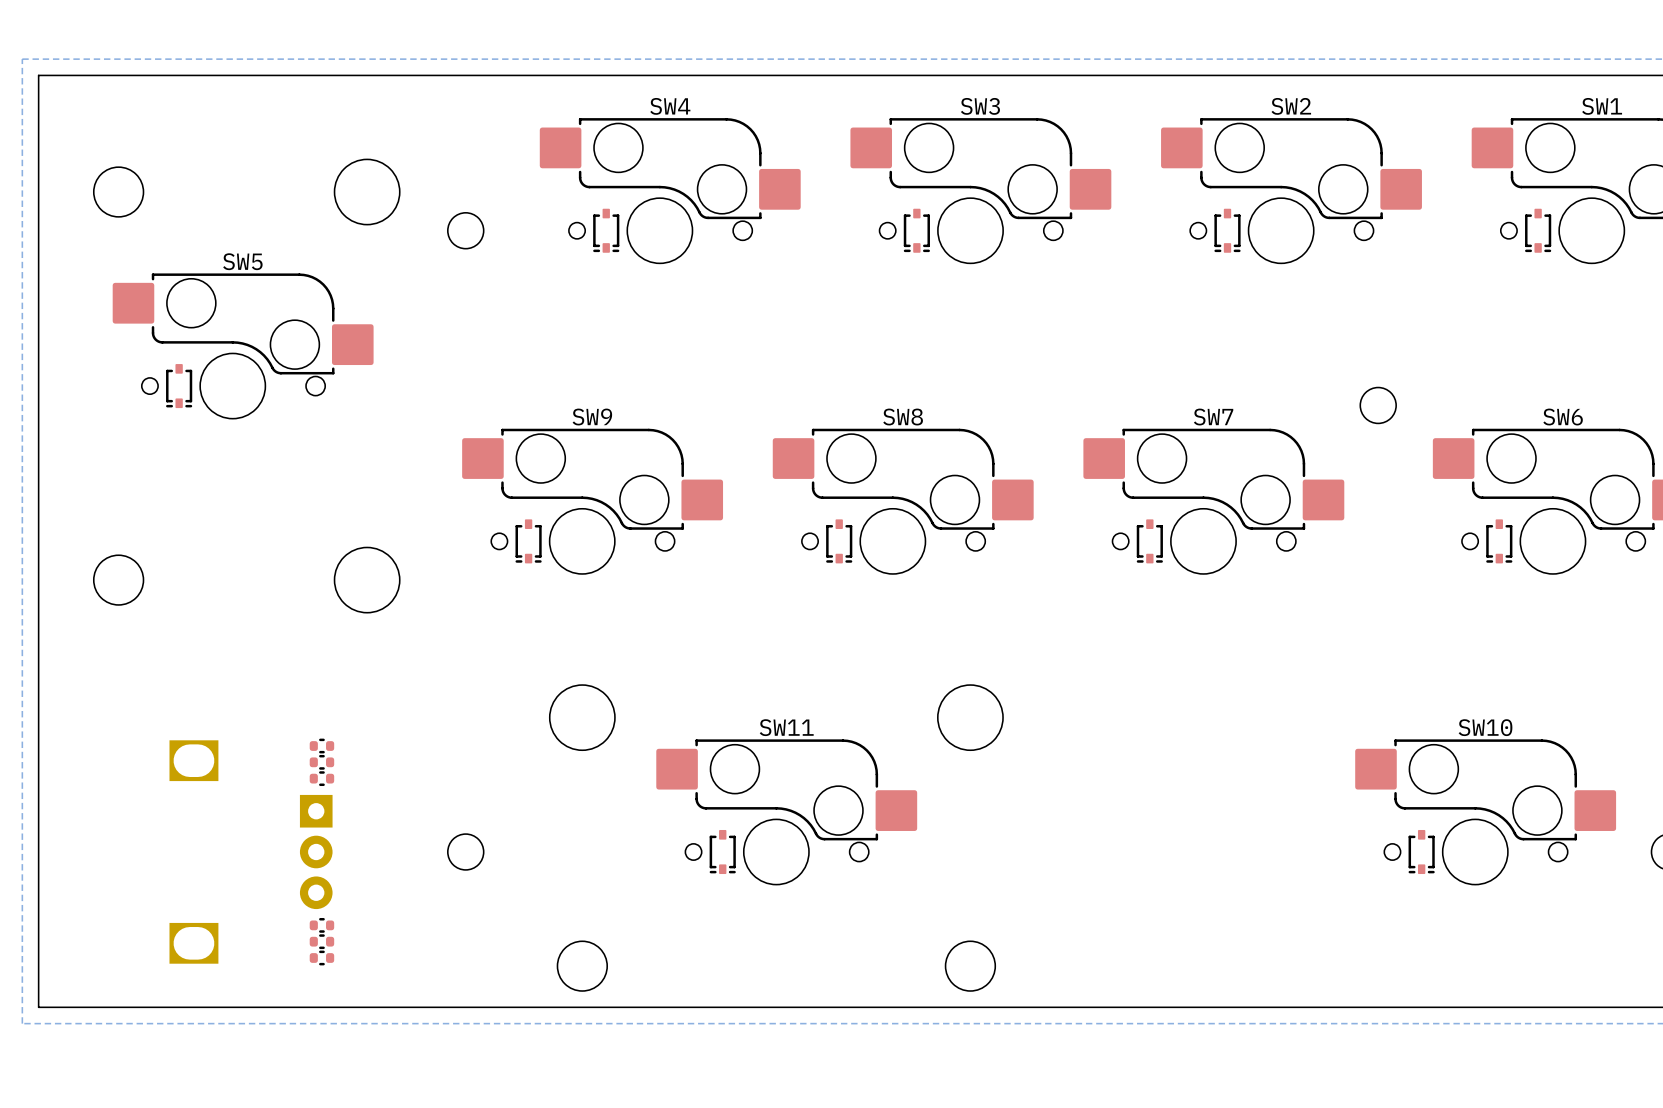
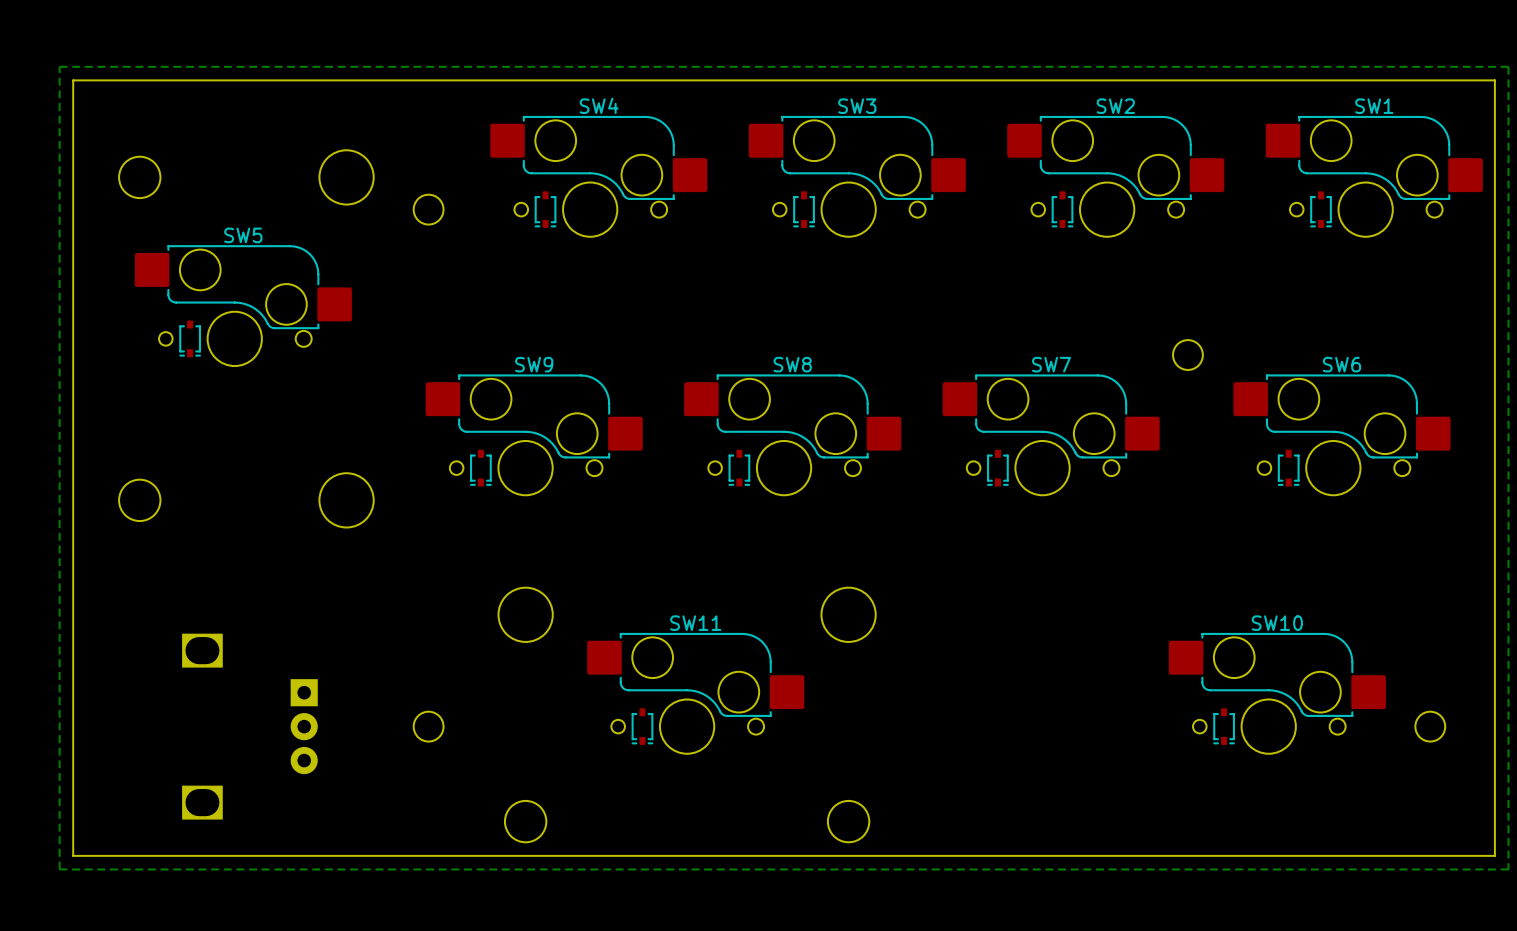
part: (321, 746) -> none
part: (321, 762) -> none
part: (321, 778) -> none
part: (321, 925) -> none
part: (321, 941) -> none
part: (321, 957) -> none

